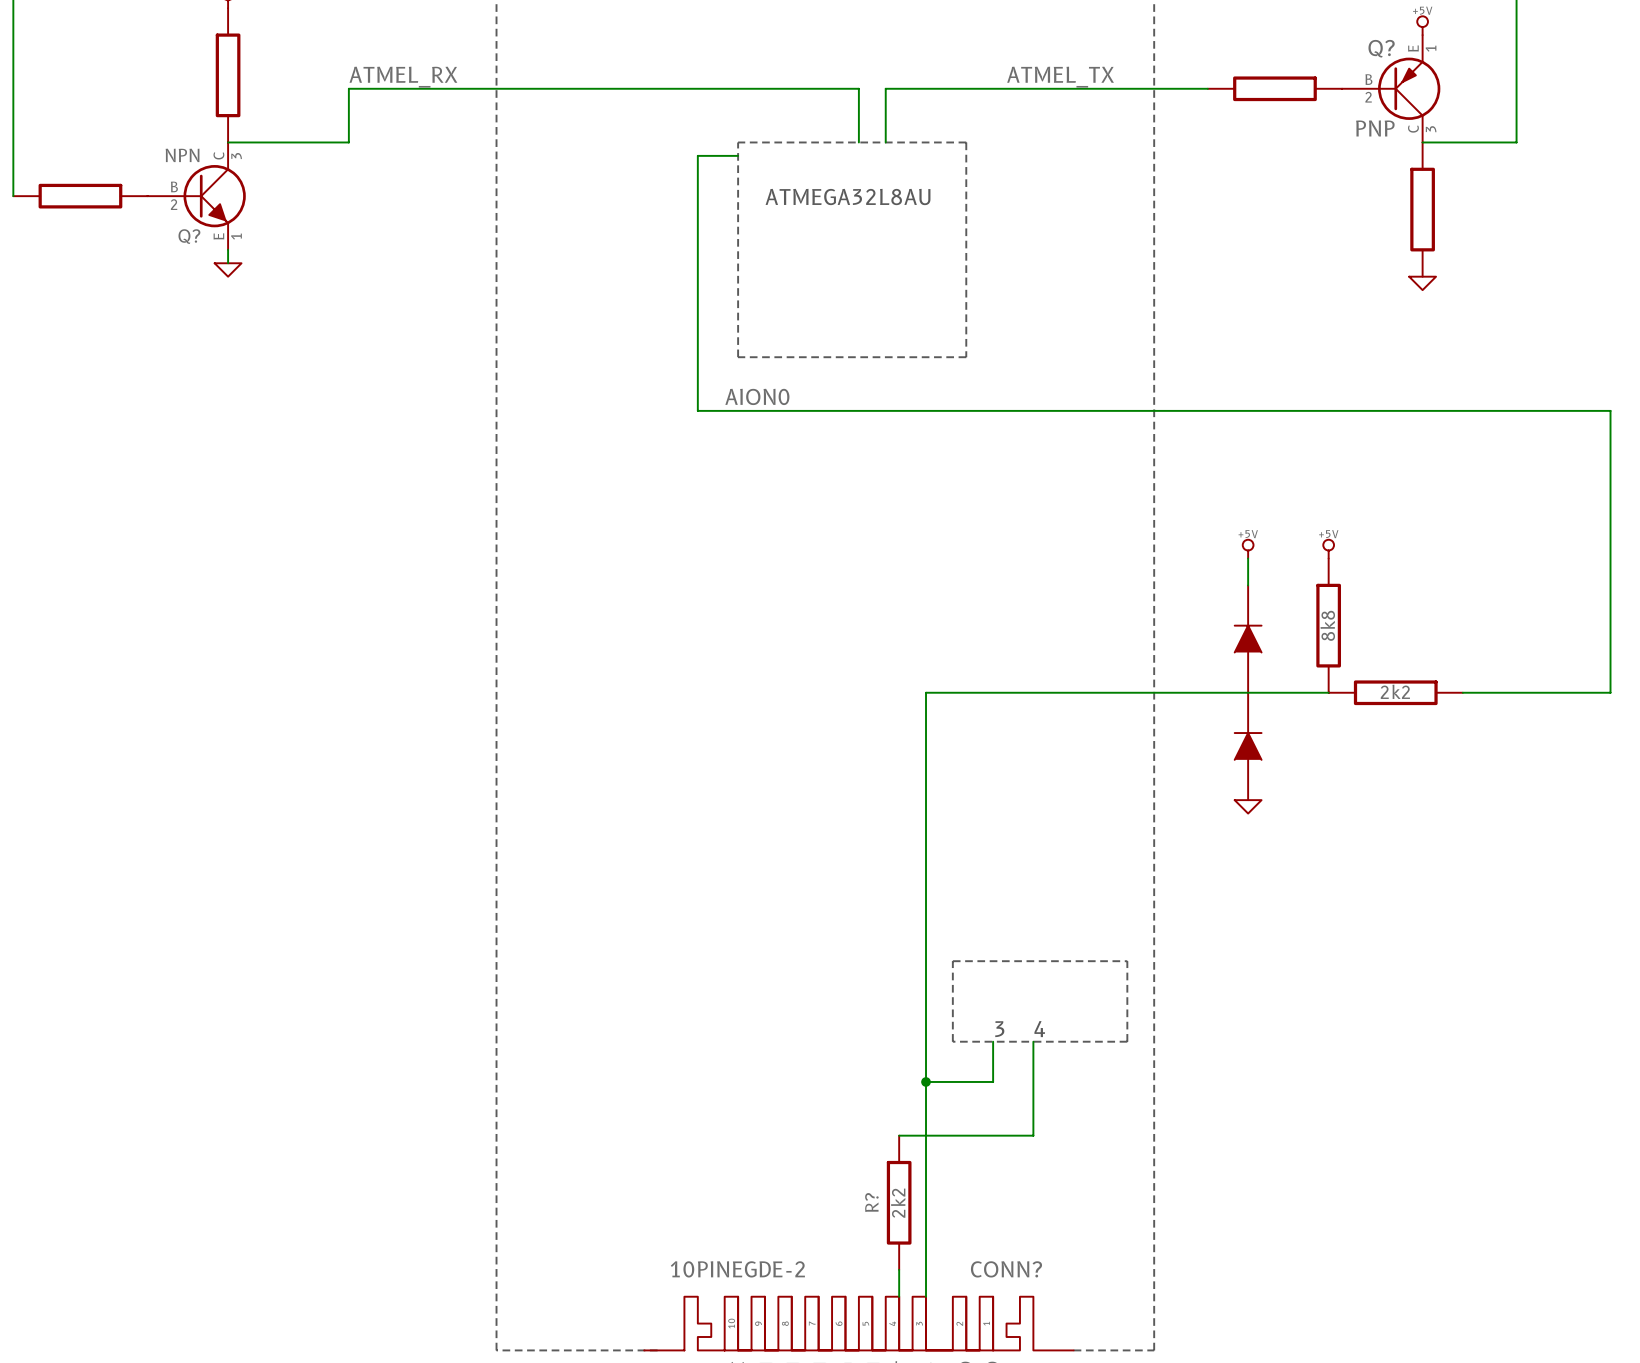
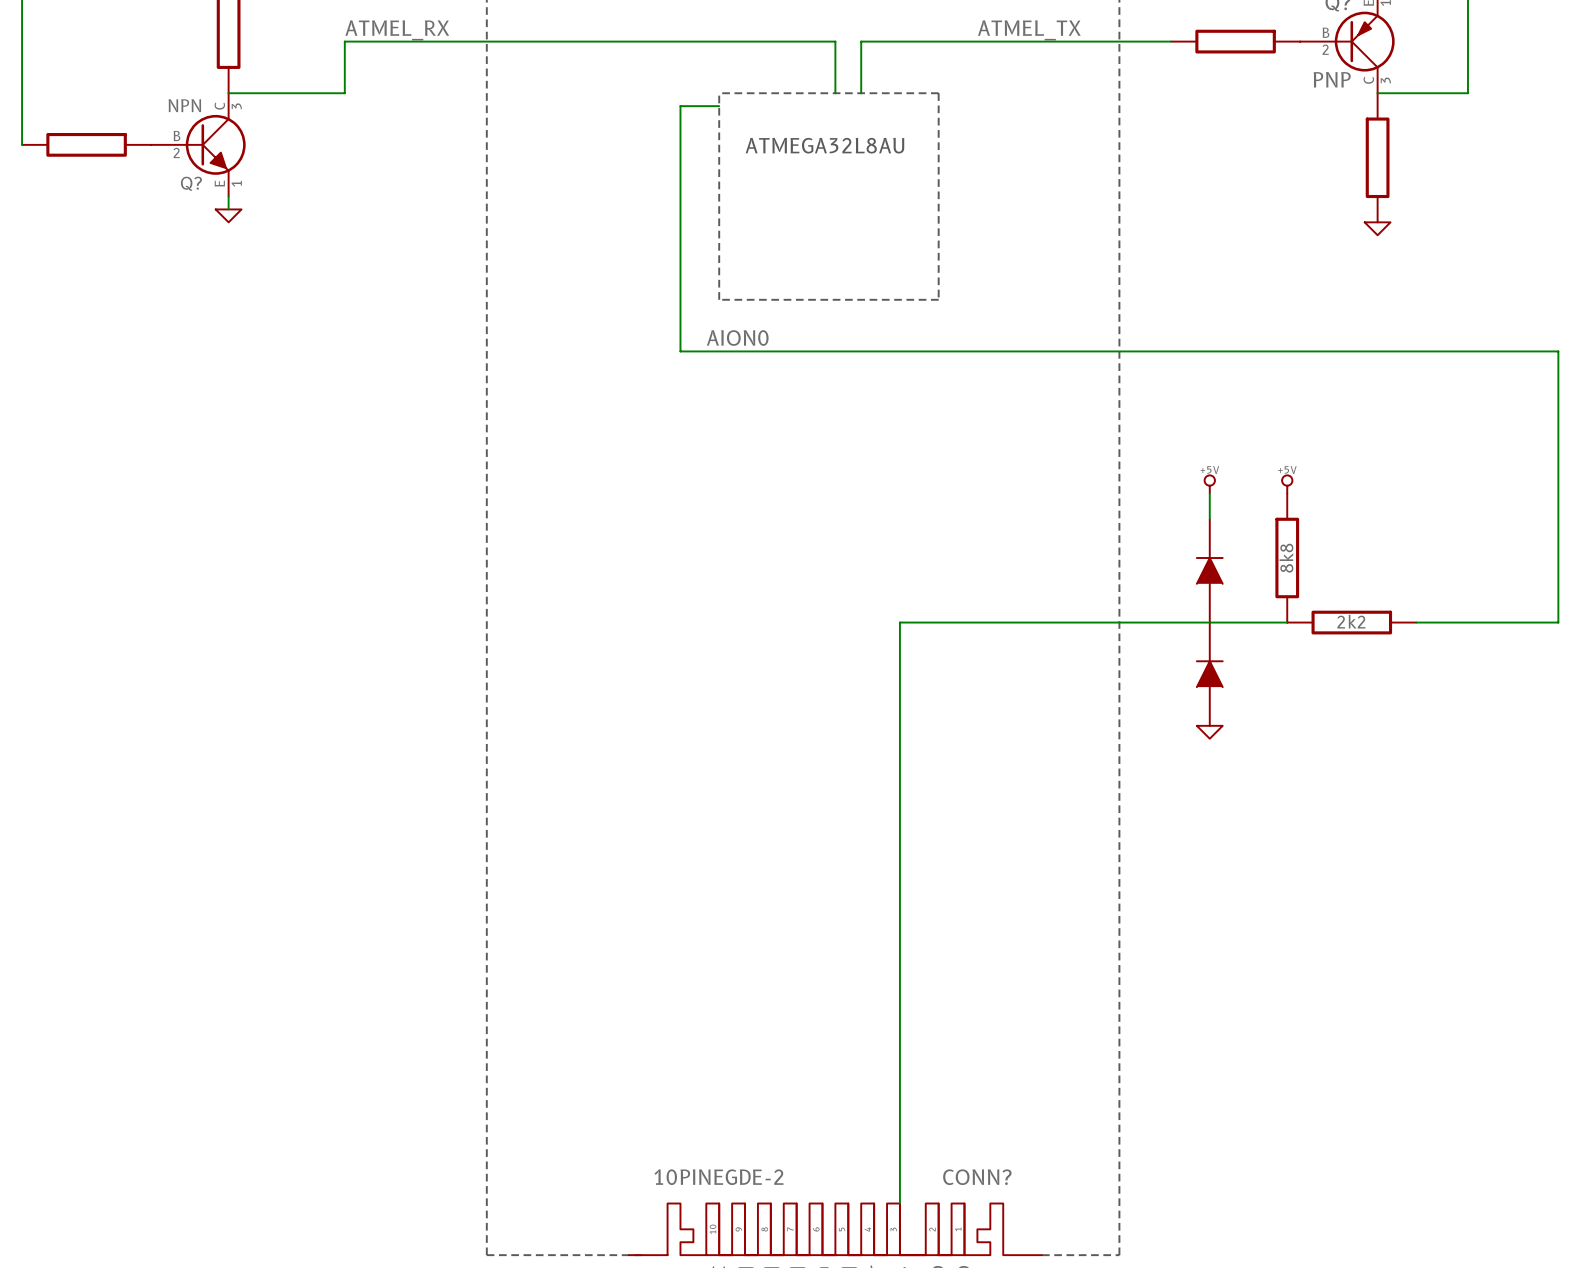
line: (952, 961) (952, 1041) (1127, 1041) (1127, 961) (952, 961) -> none
text: 3 (999, 1029) -> none
text: 4 (1039, 1029) -> none
wire: (993, 1041) (993, 1081) (926, 1081) -> none
wire: (1033, 1041) (1033, 1135) (899, 1135) -> none
junction: (926, 1081) -> none
R?: 2k2 (899, 1202) -> none
wire: (899, 1269) (899, 1296) -> none

